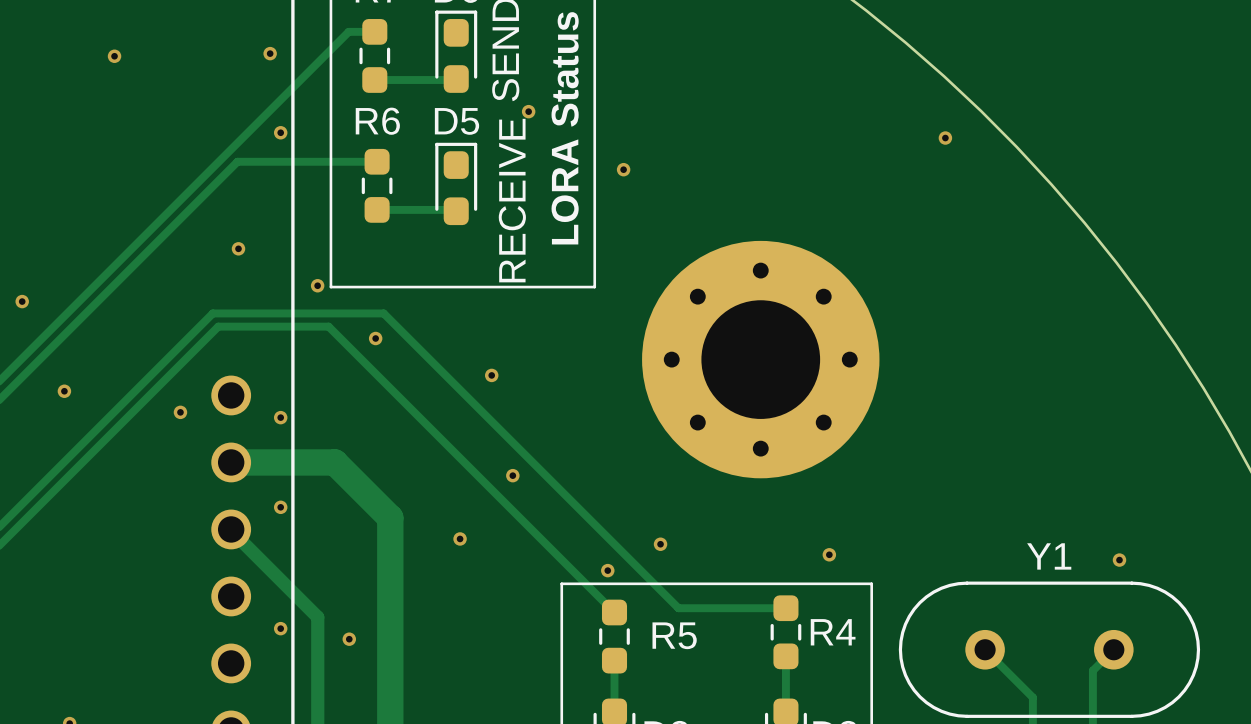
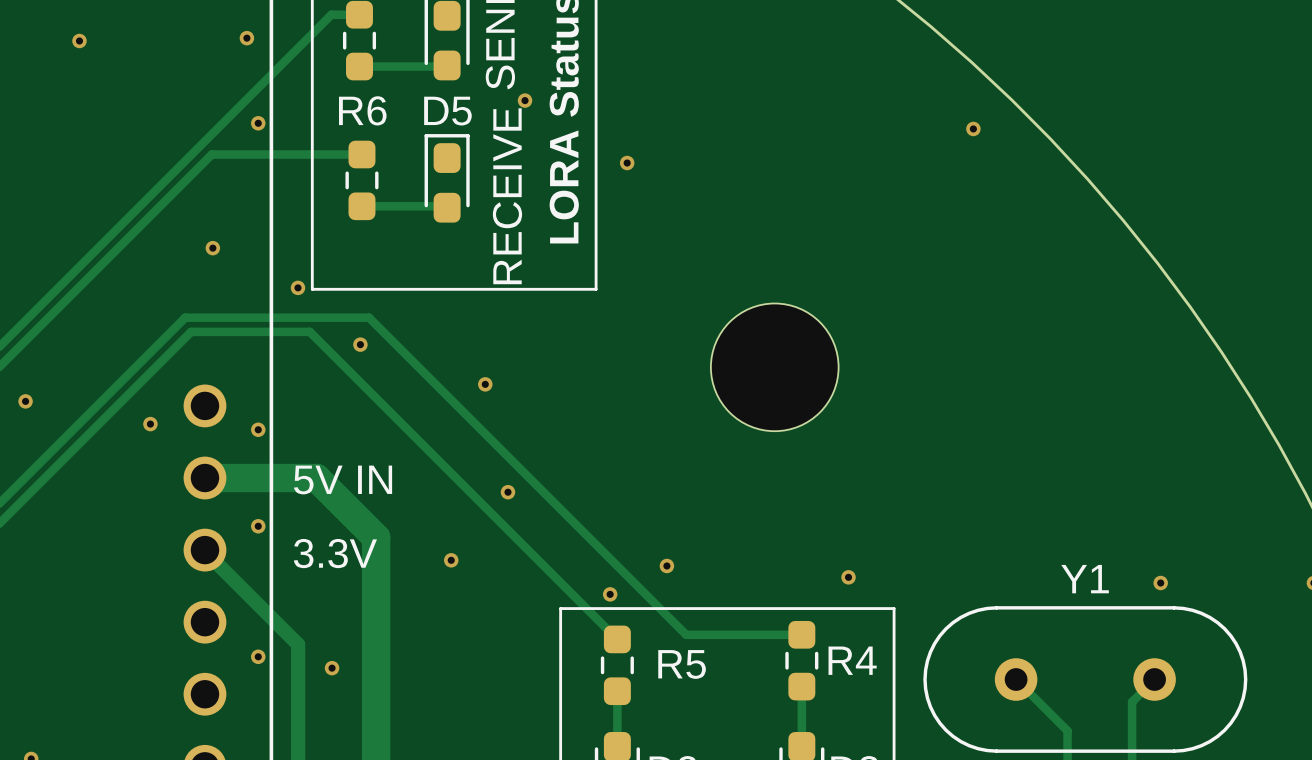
part footprint: [642, 240, 880, 479] -> [710, 303, 839, 432]
text: none -> 5V IN (343, 479)
text: none -> 3.3V (335, 553)

